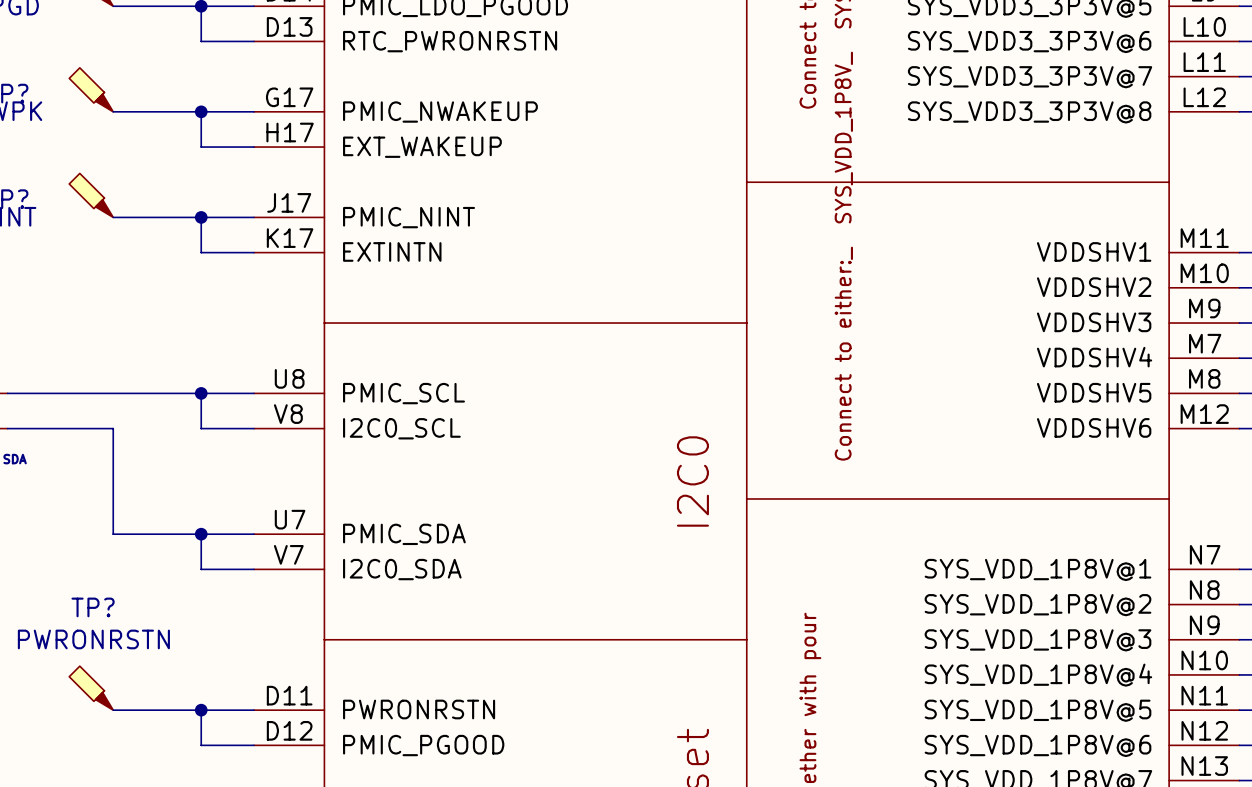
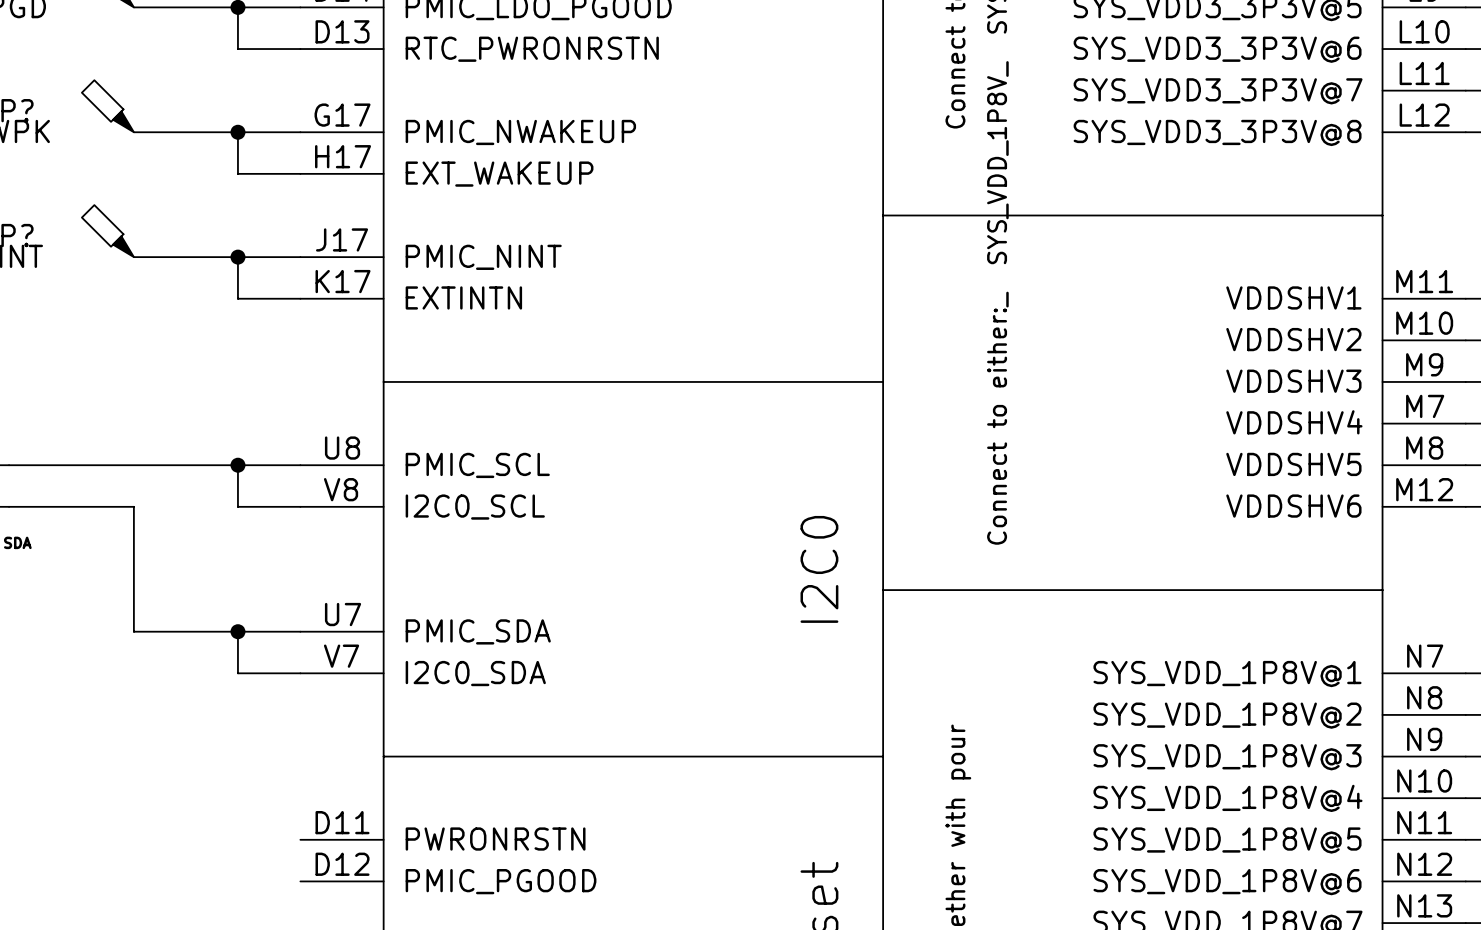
TP?: PWRONRSTN (91, 688) -> none
wire: (113, 710) (254, 710) -> none
wire: (201, 710) (201, 745) (254, 745) -> none
junction: (201, 710) -> none

